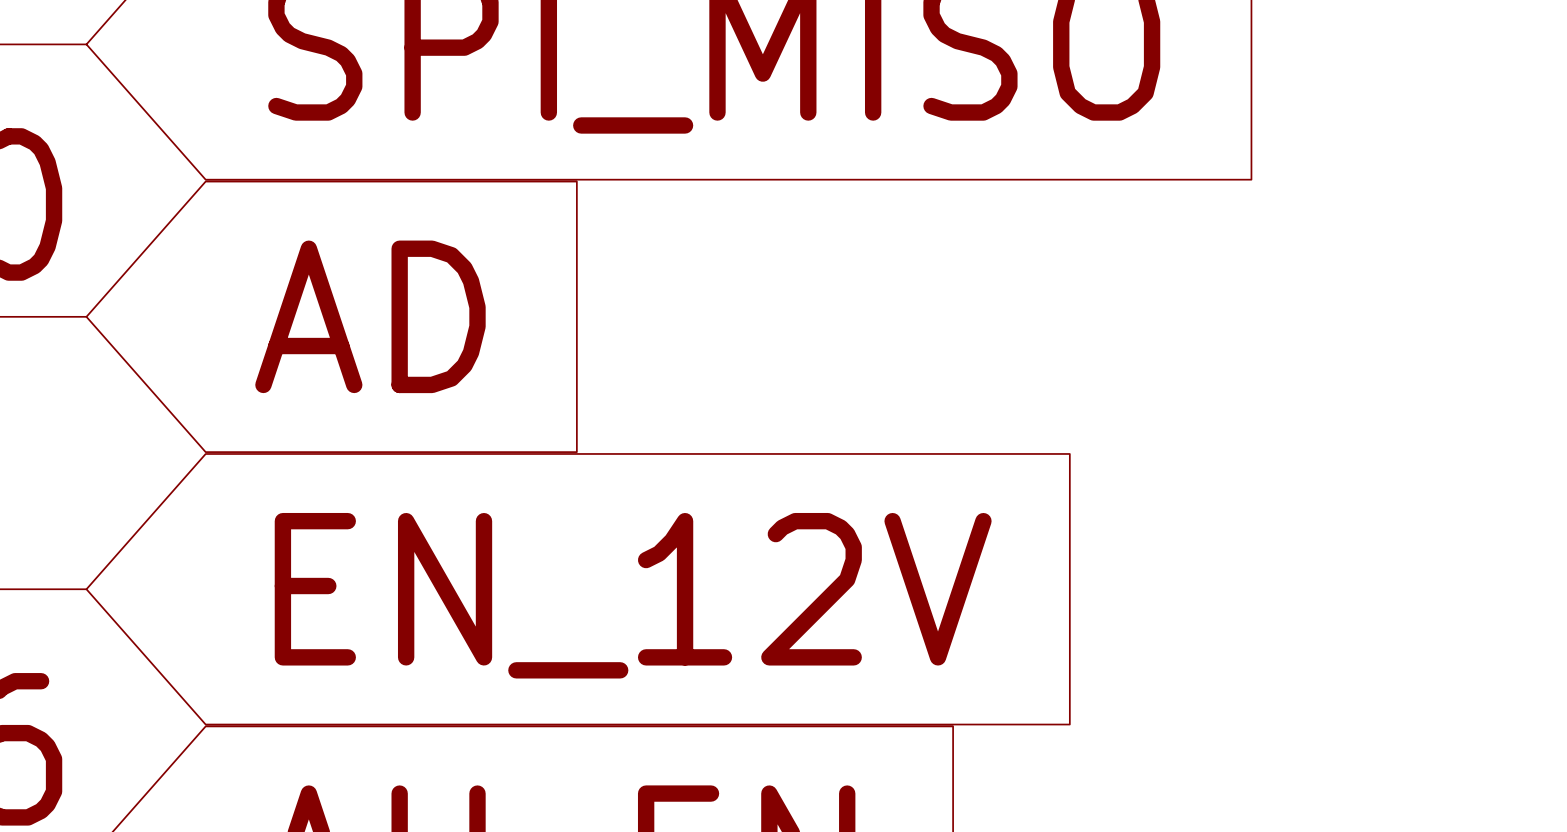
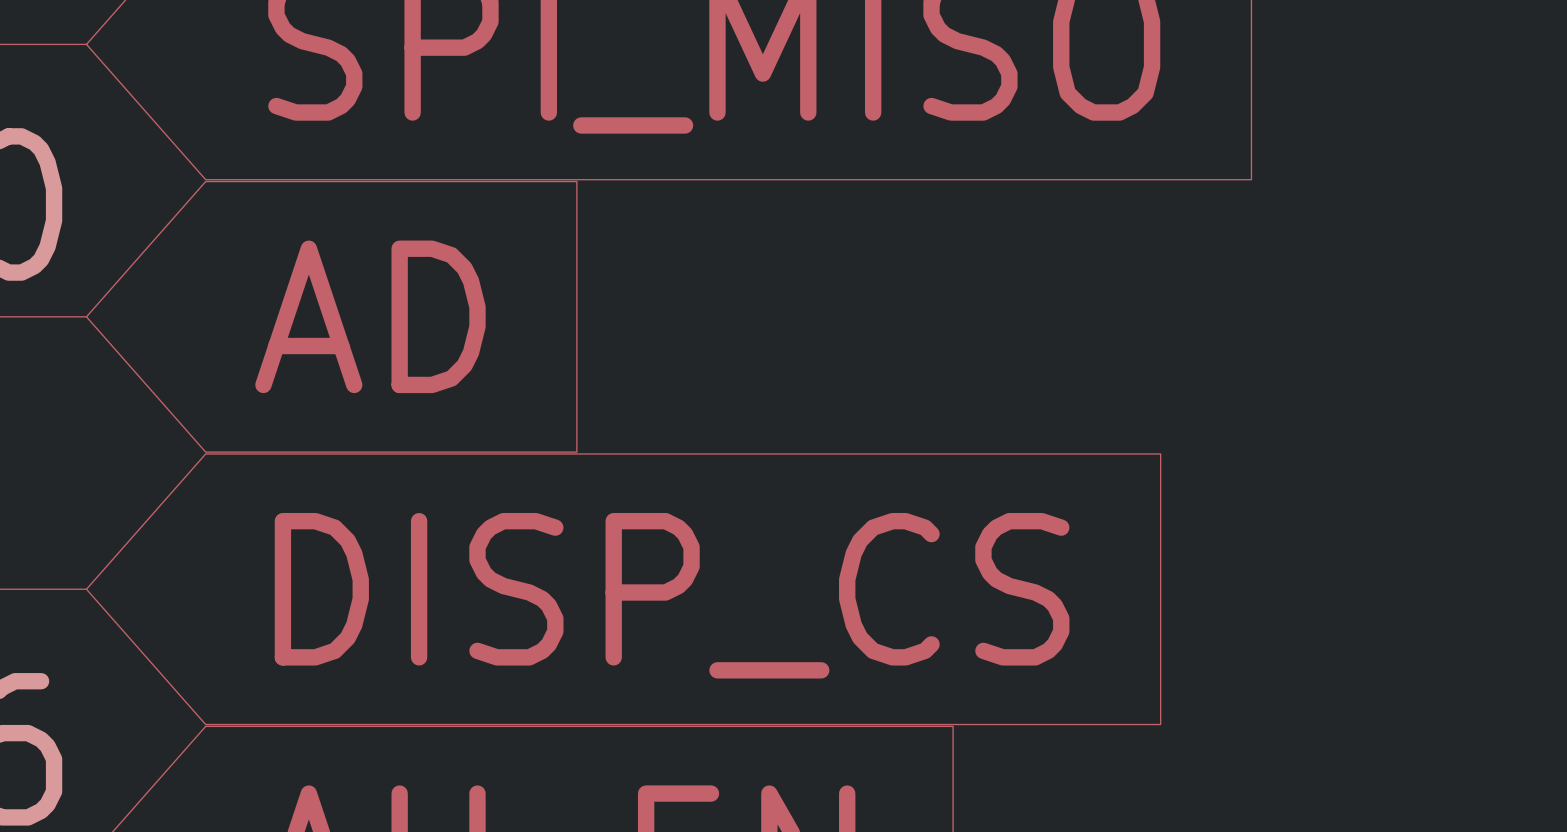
global label: EN_12V (633, 595) -> DISP_CS (672, 595)

